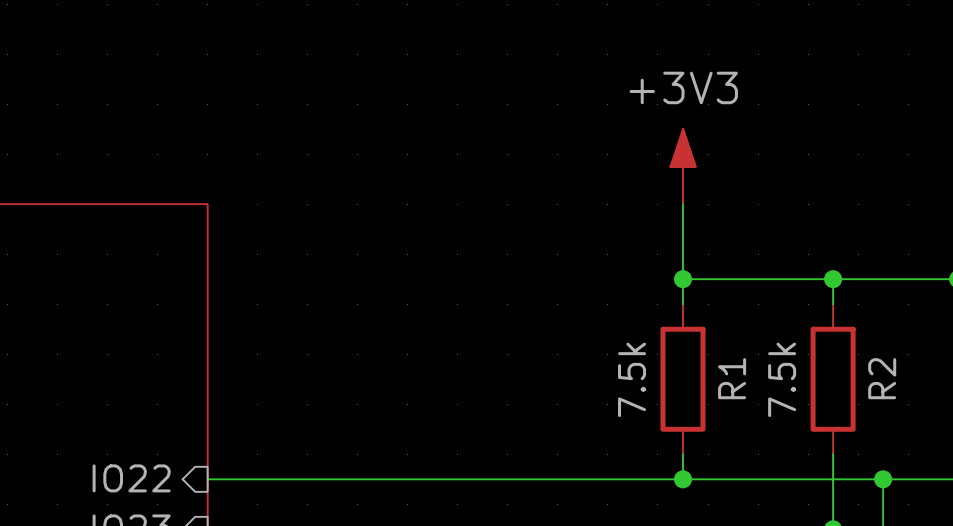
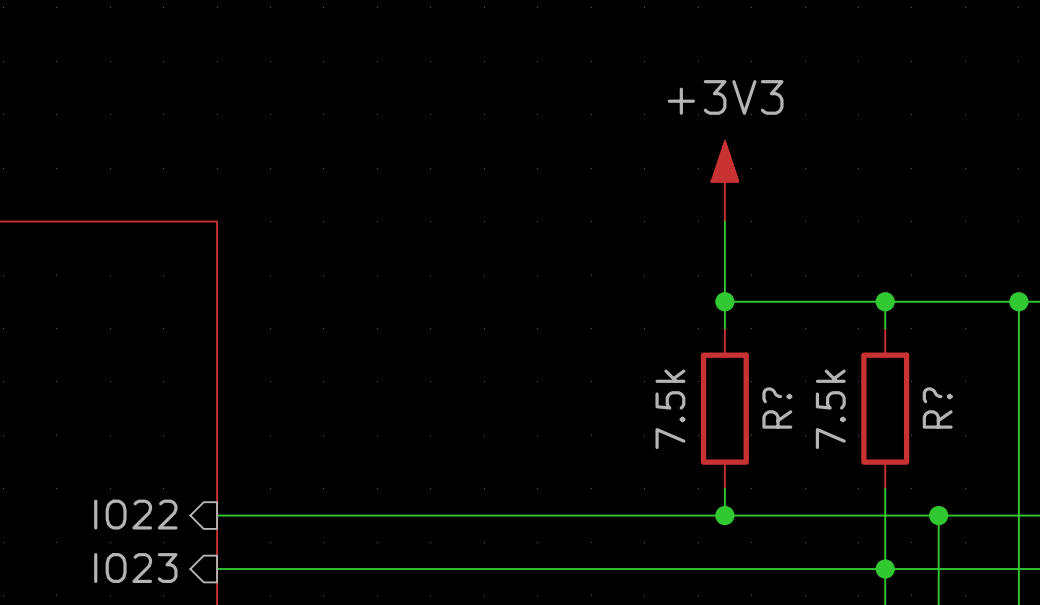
R1 name: R1 (732, 378) -> R? (777, 408)
R2 name: R2 (882, 378) -> R? (937, 408)

